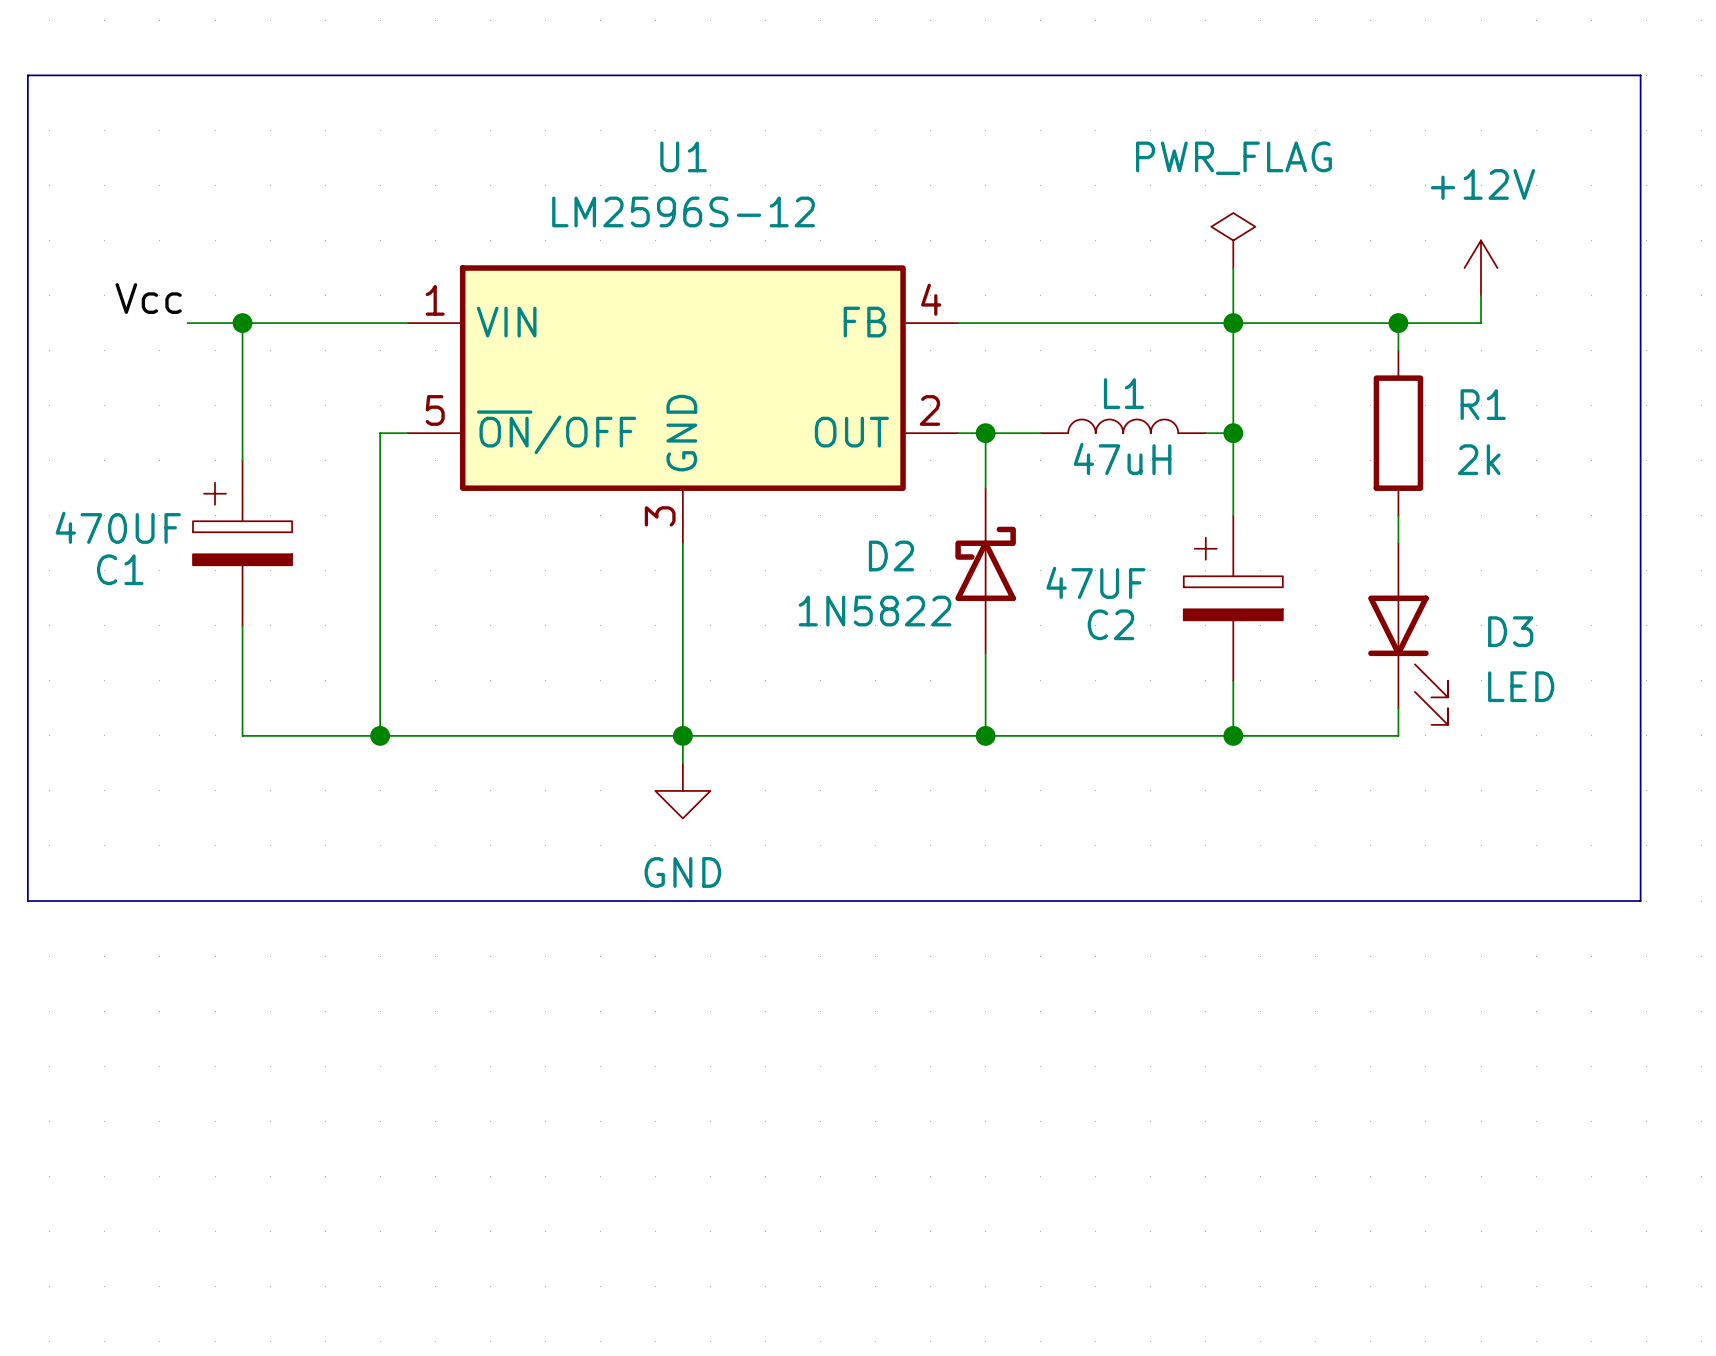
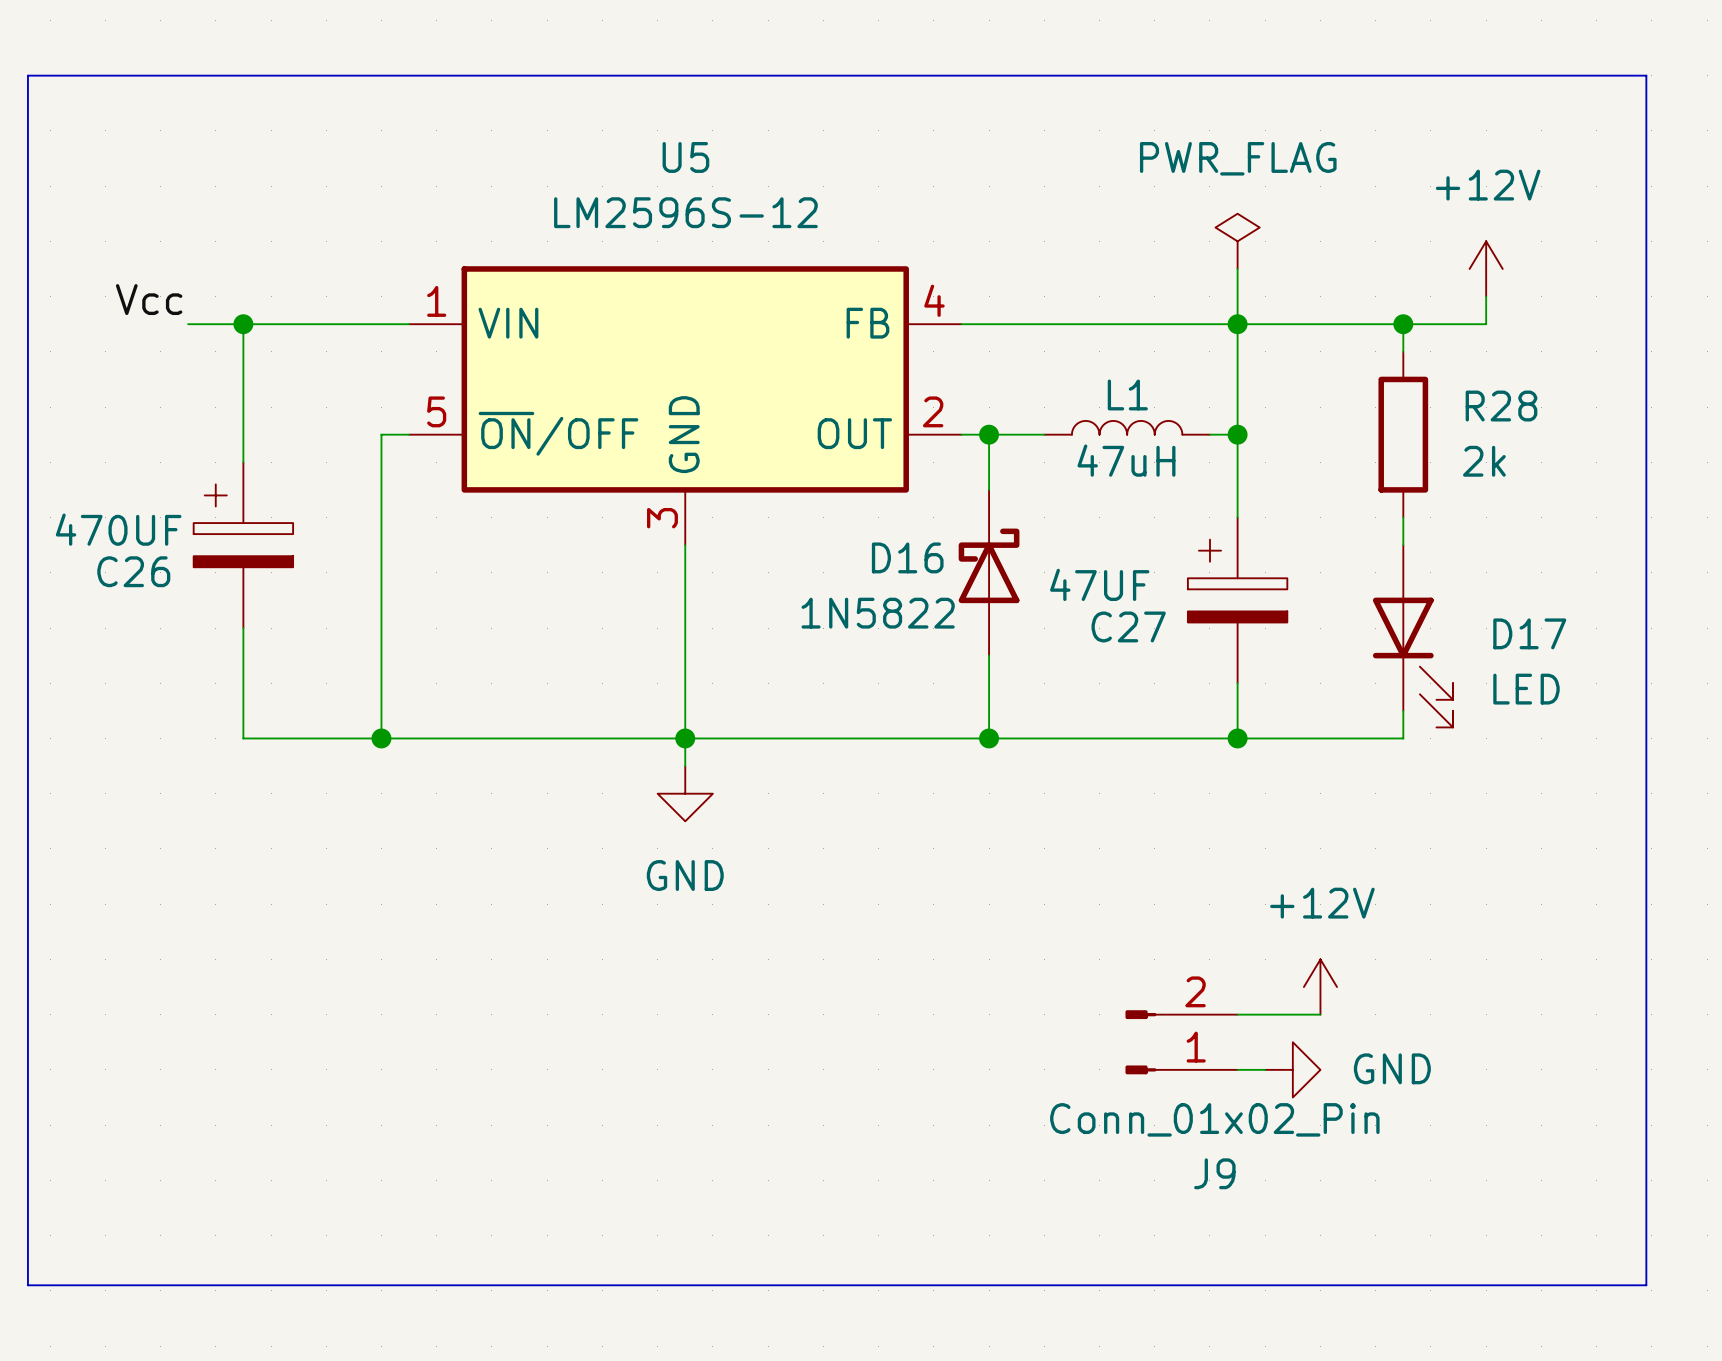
U1 name: U1 (683, 156) -> U5 (685, 157)
R1 name: R1 (1483, 404) -> R28 (1501, 406)
D2 name: D2 (891, 555) -> D16 (907, 557)
C1 name: C1 (120, 569) -> C26 (133, 571)
C2 name: C2 (1110, 624) -> C27 (1128, 626)
D3 name: D3 (1510, 631) -> D17 (1529, 633)
line: (27, 901) (1640, 901) -> (27, 904) (27, 1285) (1646, 1285) (1646, 904)
power symbol: none -> +12V (1320, 987)
wire: none -> (1237, 1014) (1320, 1014)
J9: none -> Conn_01x02_Pin (1181, 1042)
wire: none -> (1237, 1069) (1265, 1069)
power symbol: none -> GND (1292, 1069)

